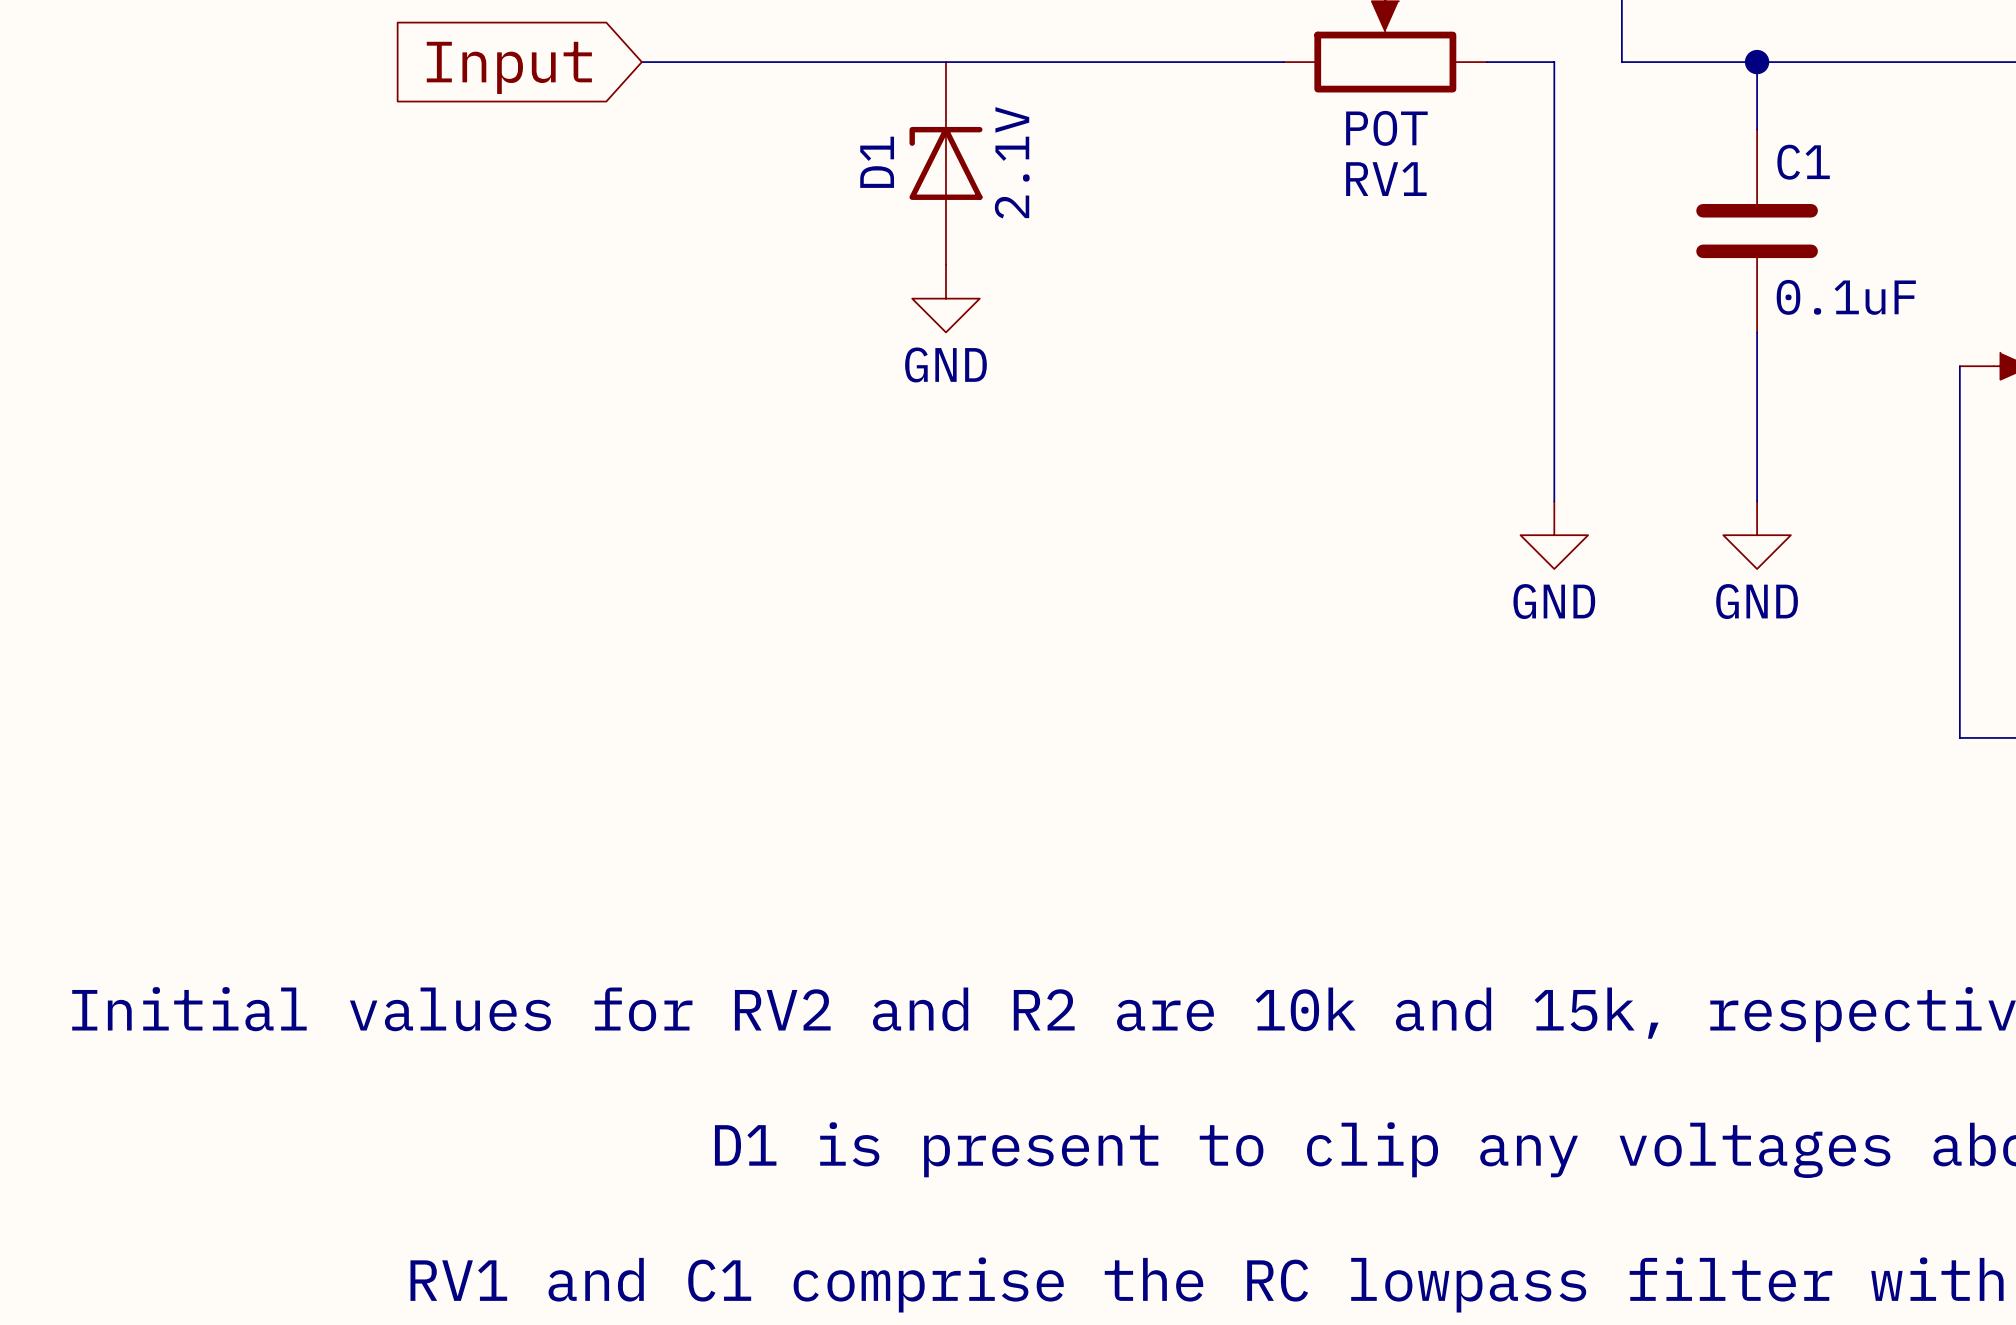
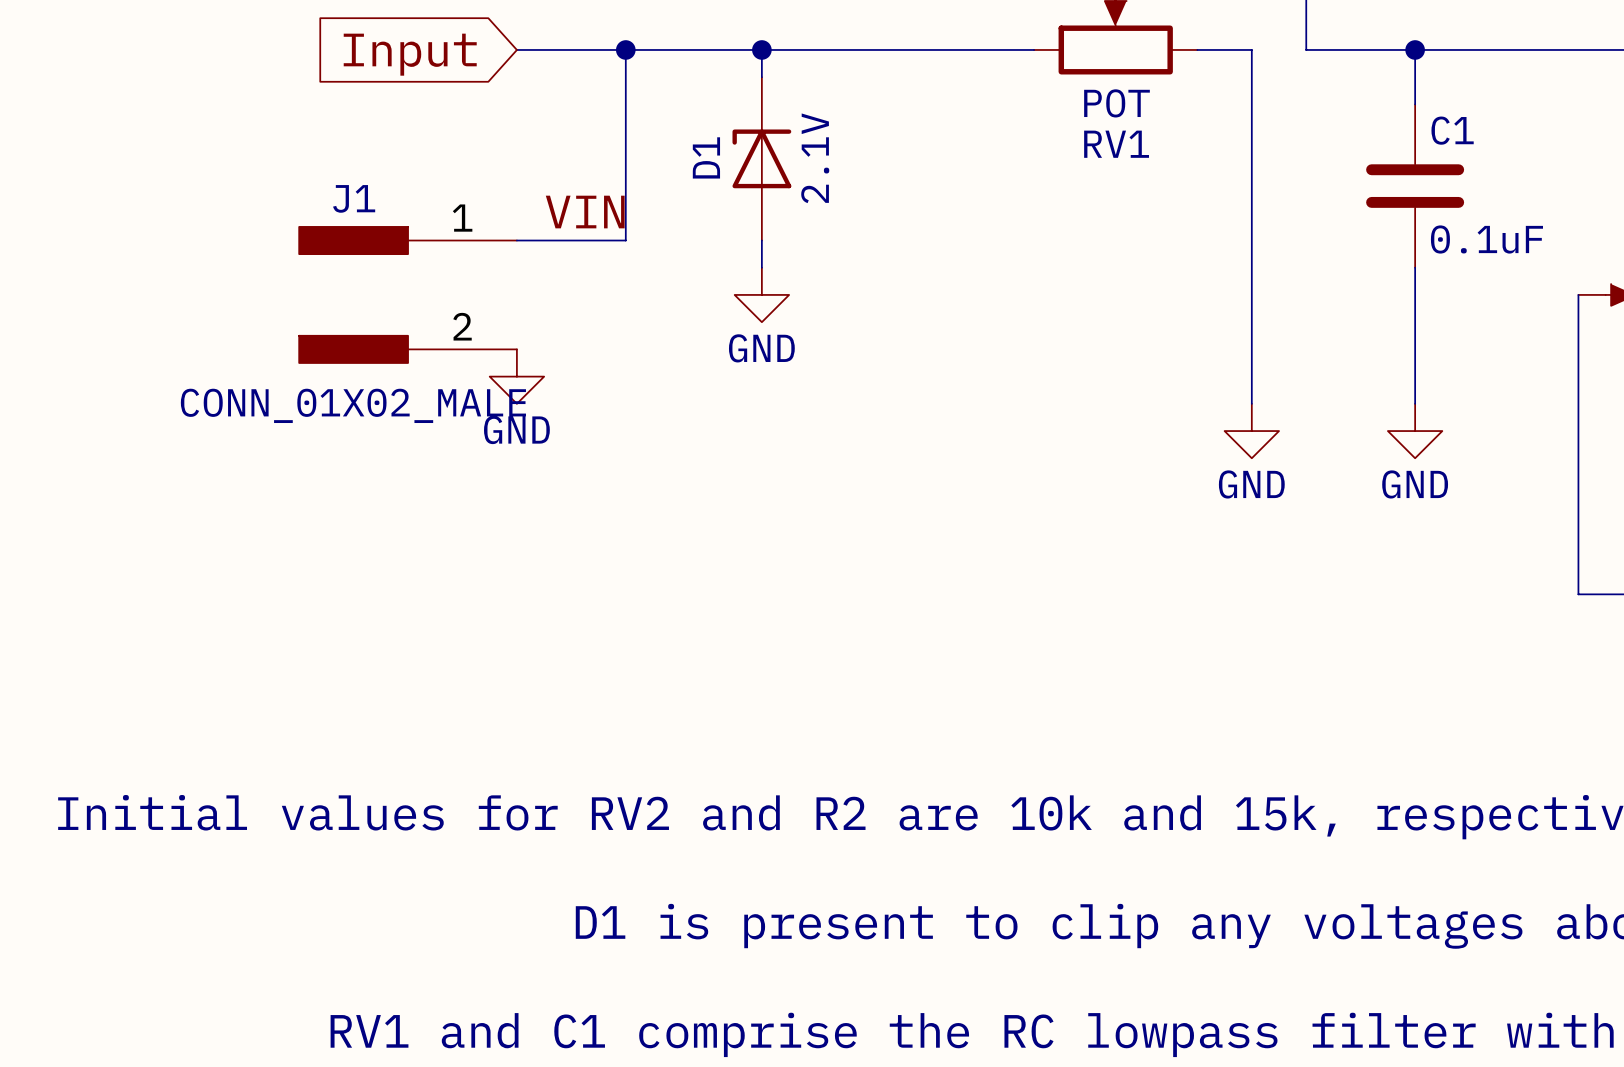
wire: none -> (625, 49) (625, 240) (516, 240)
junction: none -> (625, 49)
junction: none -> (761, 49)
D1 position: (945, 163) -> (761, 158)
label: none -> VIN (585, 212)
wire: none -> (761, 240) (761, 267)
power symbol position: GND (945, 298) -> GND (761, 294)
J1: none -> CONN_01X02_MALE (408, 294)
power symbol: none -> GND (516, 376)

